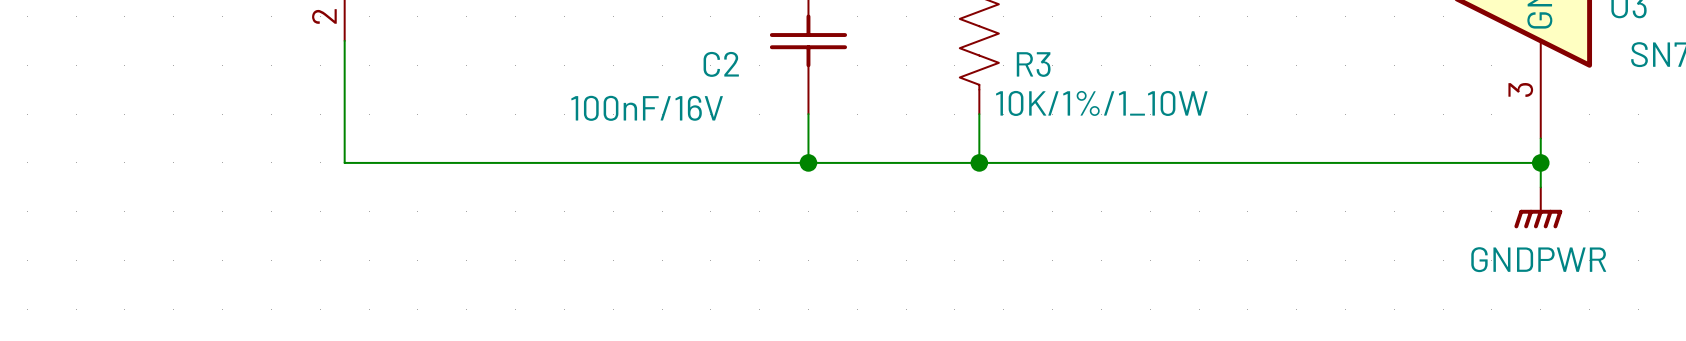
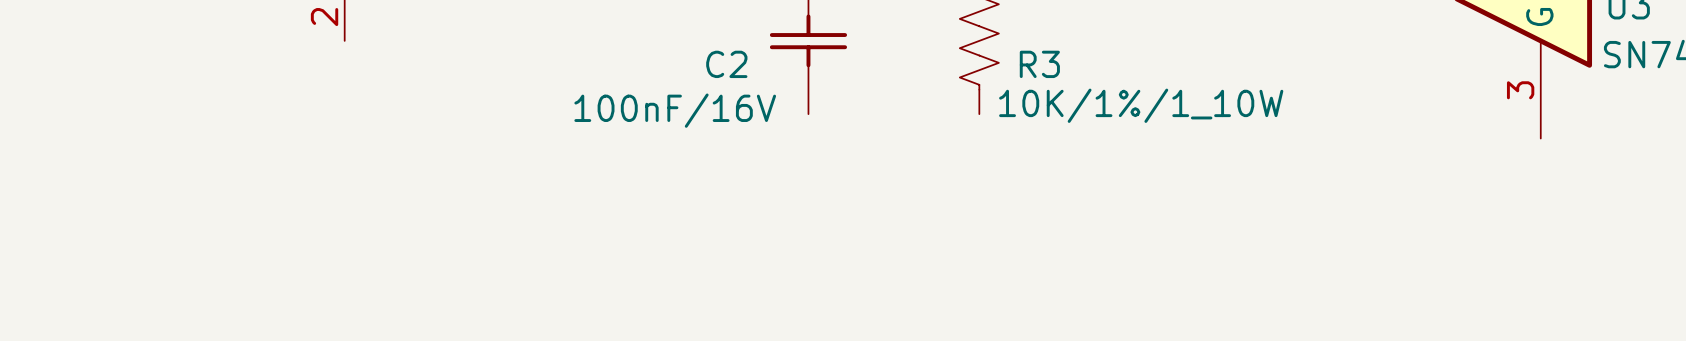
wire: (344, 40) (344, 162) (1540, 162) -> none
wire: (808, 114) (808, 162) -> none
wire: (979, 114) (979, 162) -> none
wire: (1540, 138) (1540, 187) -> none
junction: (808, 162) -> none
junction: (979, 162) -> none
junction: (1540, 162) -> none
power symbol: GNDPWR (1538, 207) -> none

